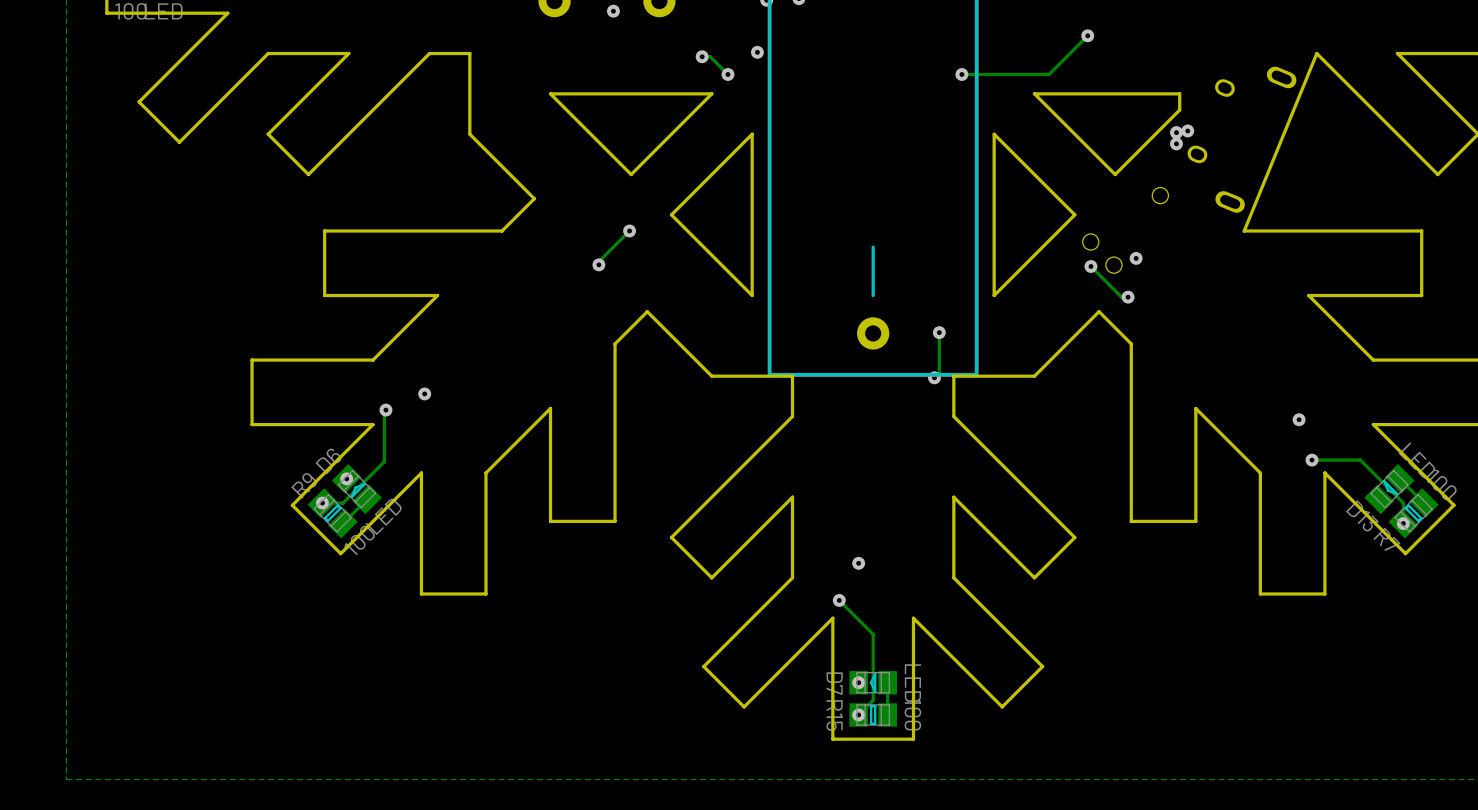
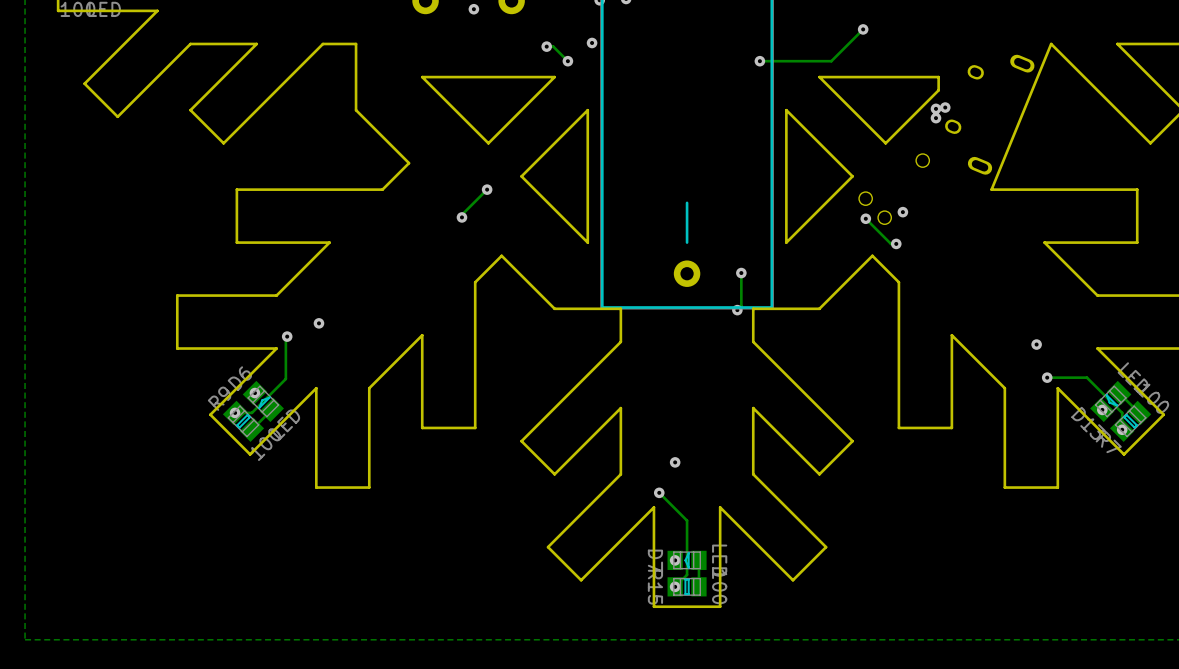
via: none -> (1102, 409)

